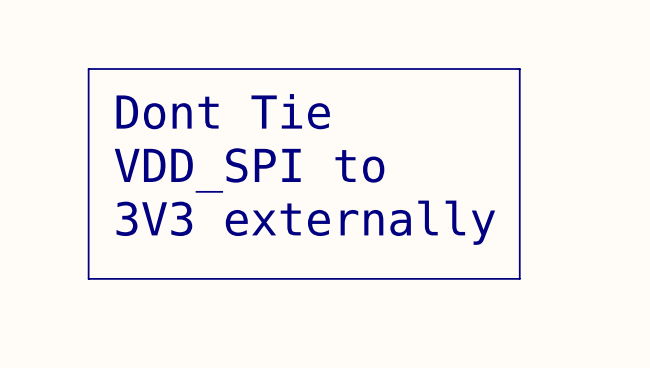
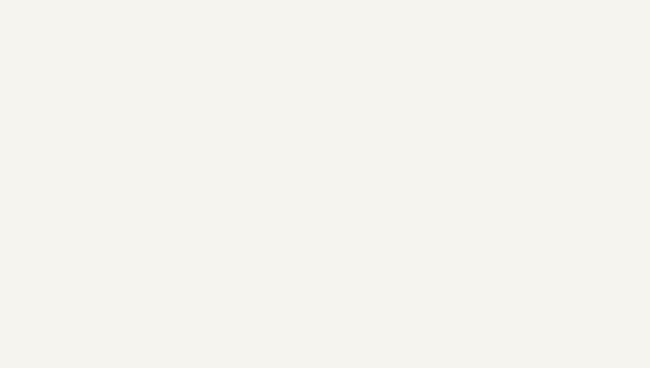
line: (88, 69) (519, 69) (519, 278) (88, 278) (88, 69) -> none
text: Dont Tie (223, 111) -> none
text: VDD_SPI to (249, 170) -> none
text: 3V3 externally (305, 222) -> none

